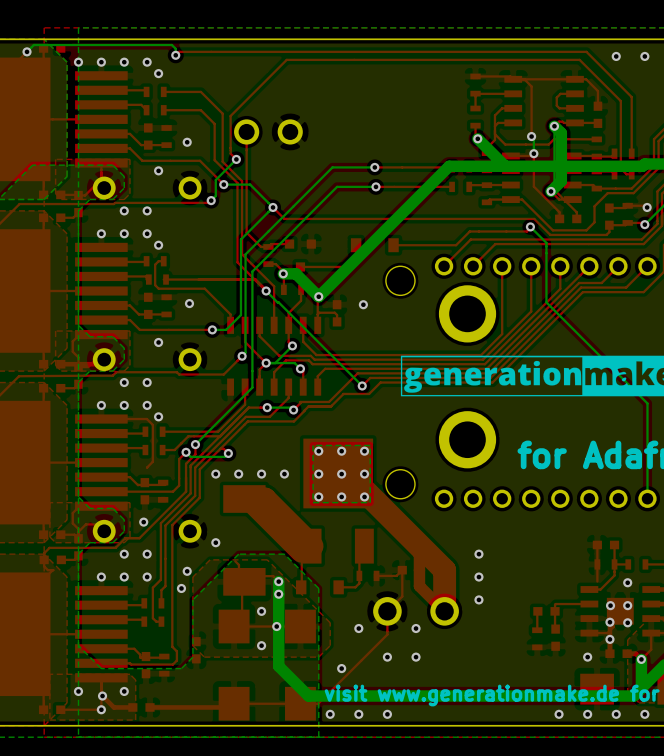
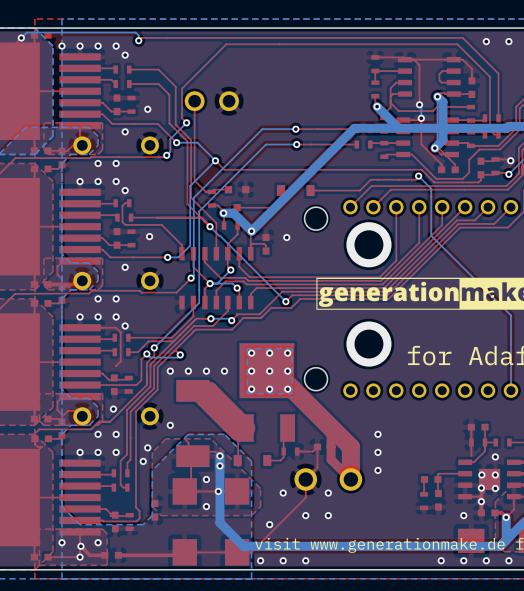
part: (467, 313) -> none
via: none -> (368, 244)
part: (467, 439) -> none
via: none -> (368, 344)

